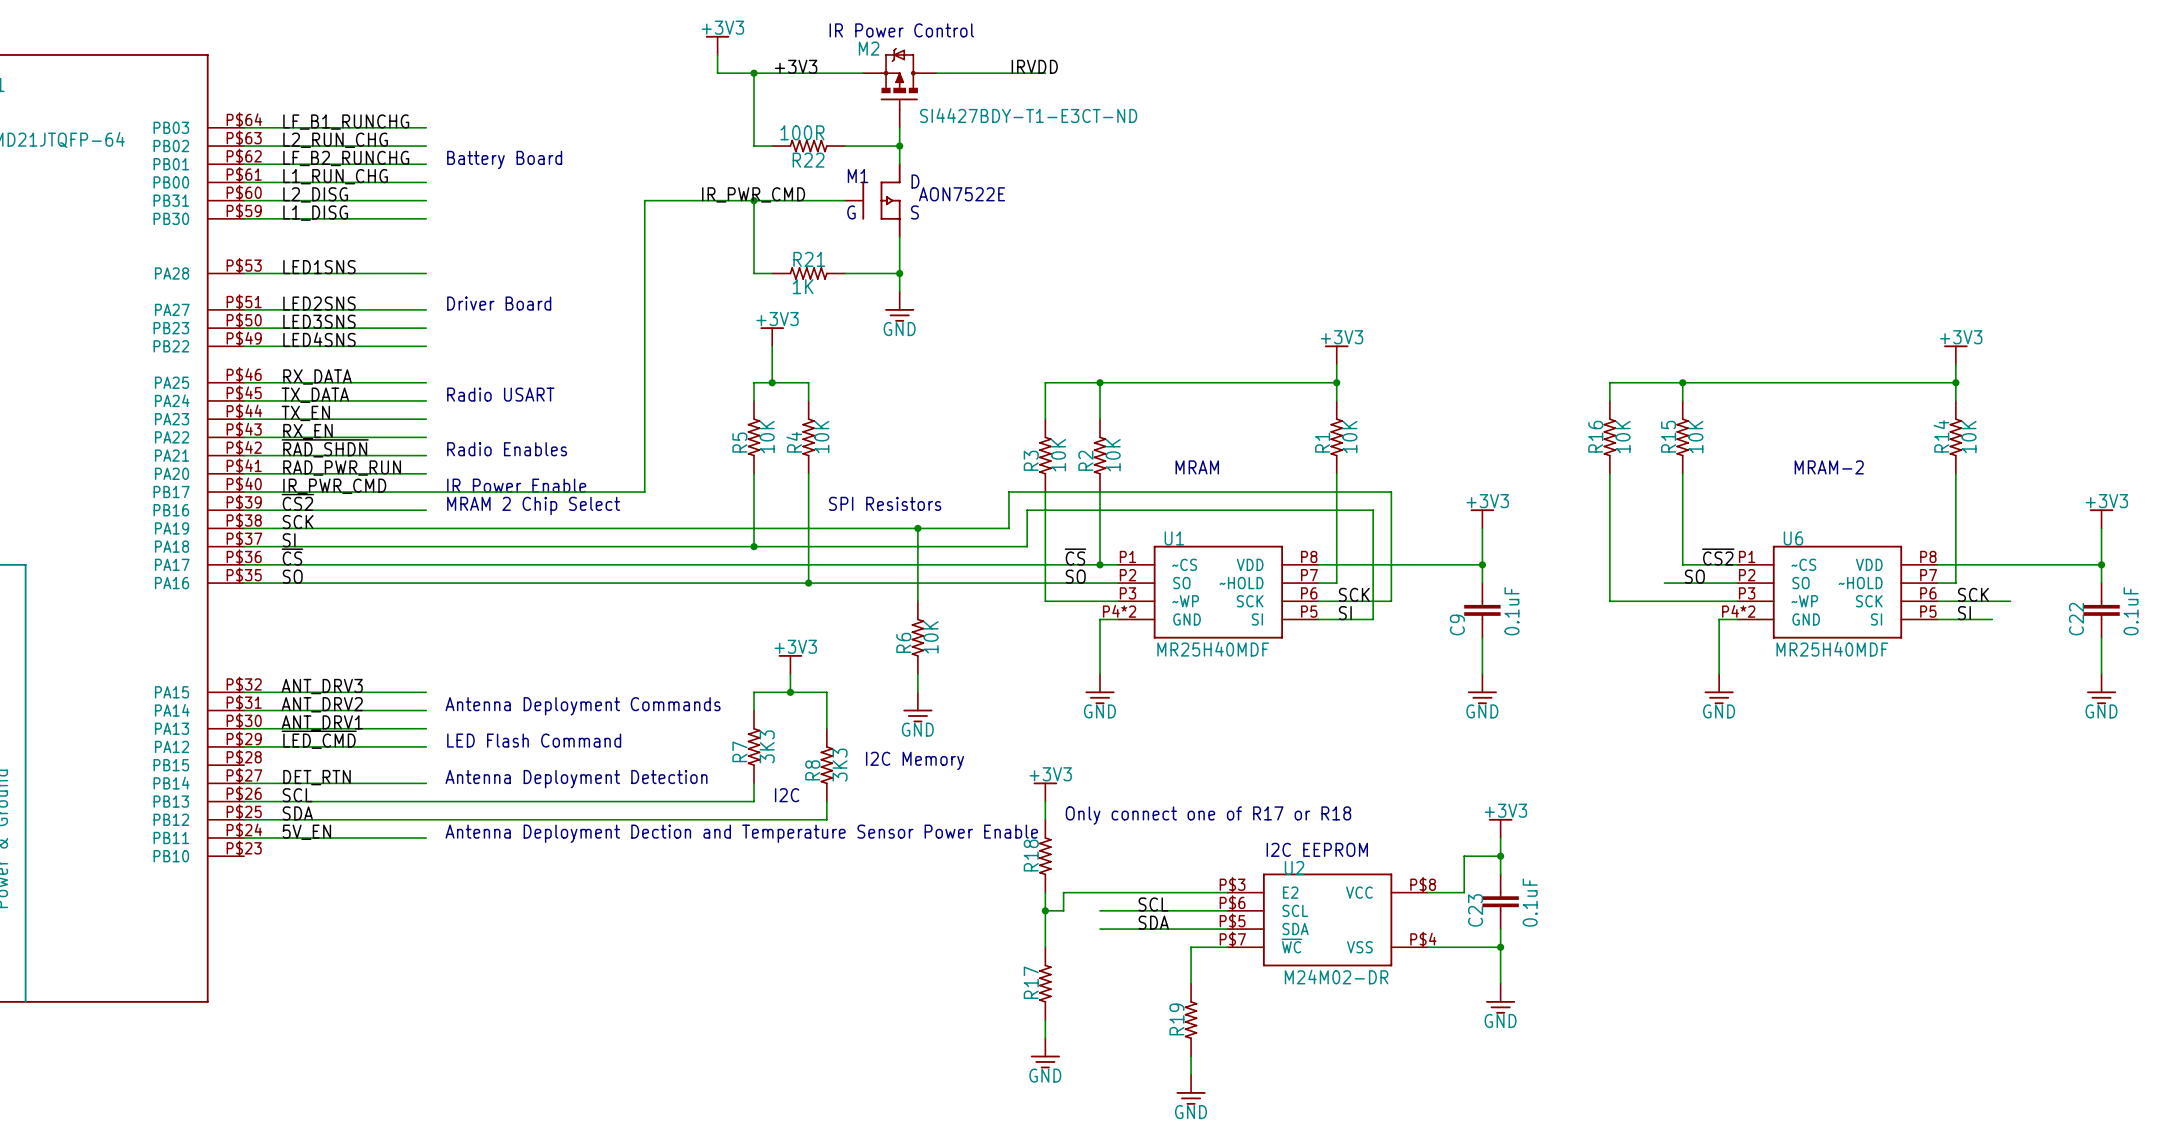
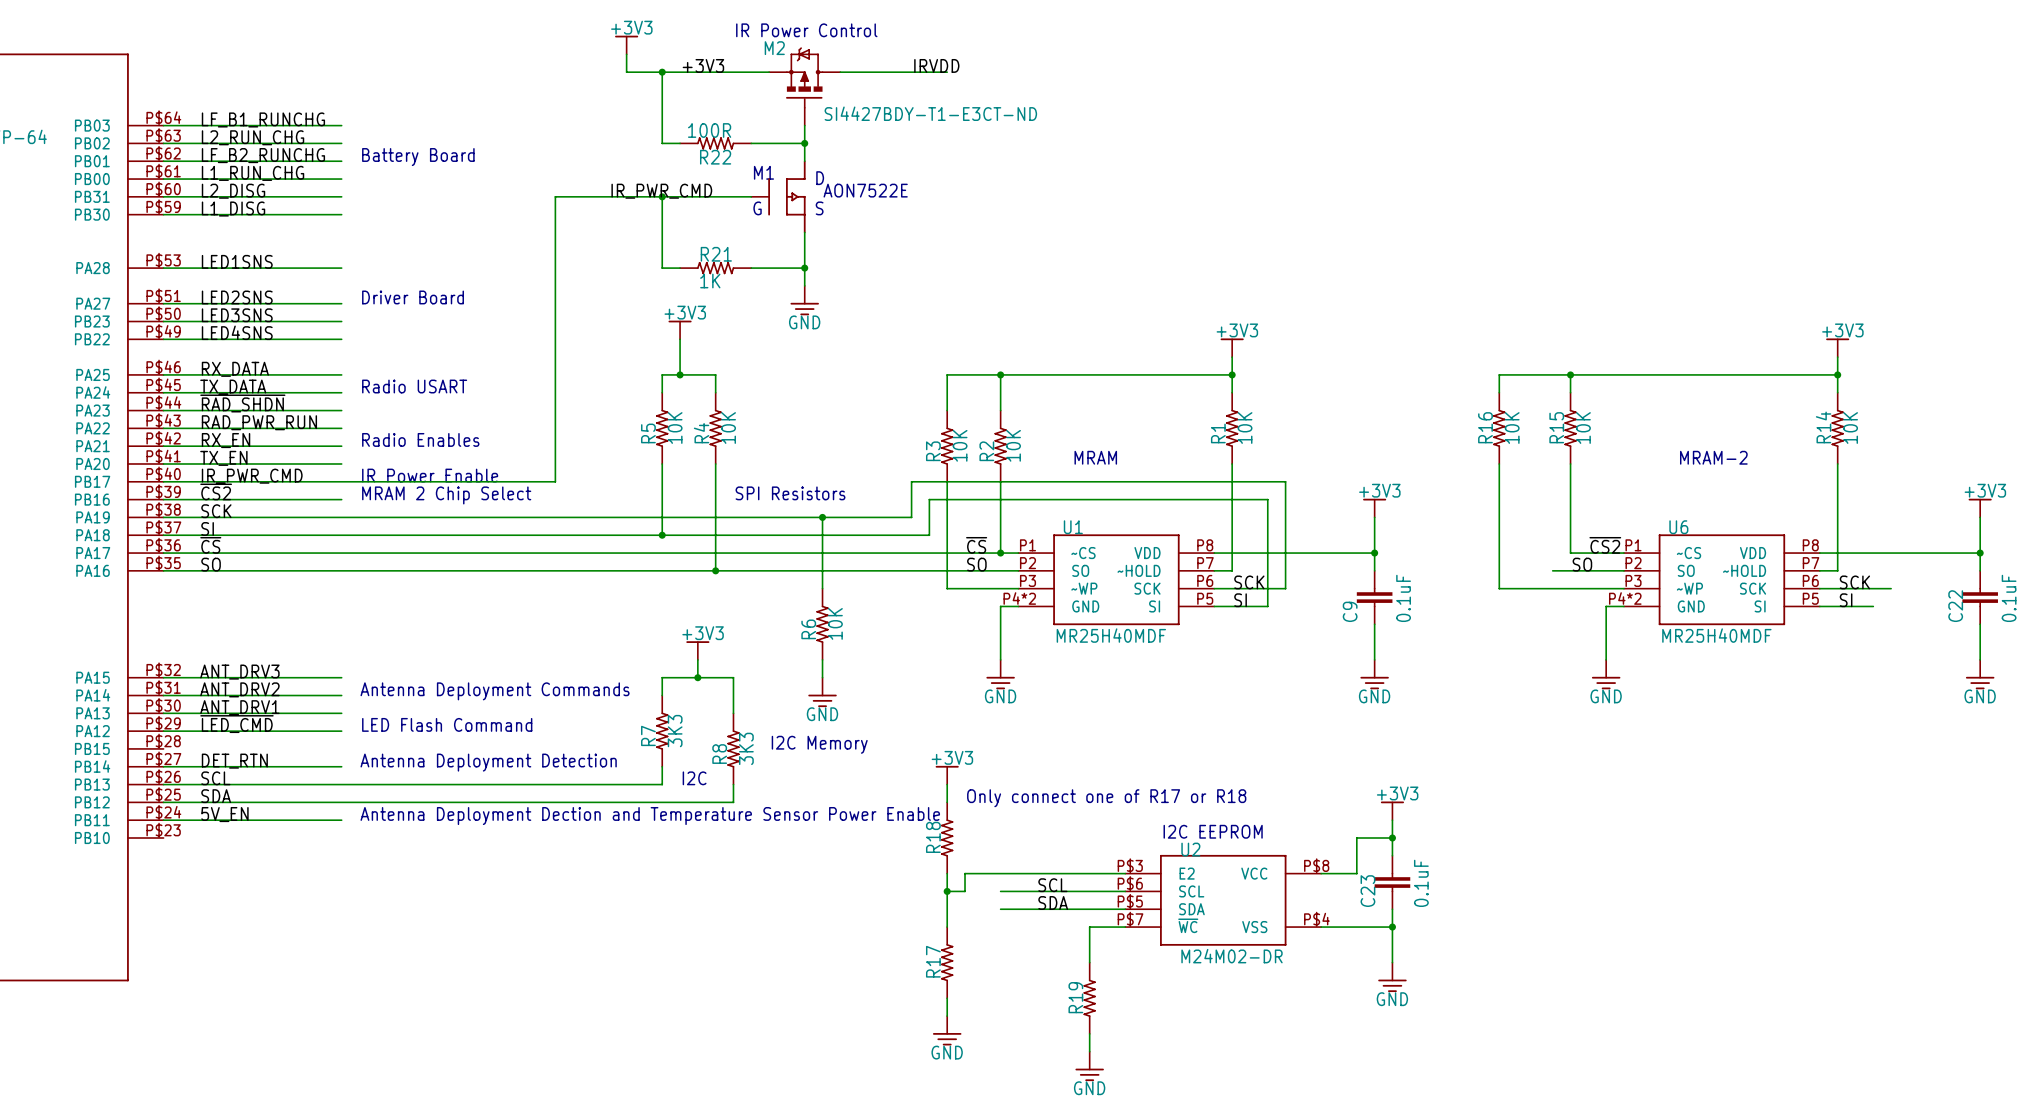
label: TX_EN (305, 413) -> ~{RAD_SHDN} (242, 403)
label: RX_EN (307, 431) -> RAD_PWR_RUN (259, 422)
label: ~{RAD_SHDN} (325, 448) -> RX_EN (226, 440)
label: RAD_PWR_RUN (342, 468) -> TX_EN (223, 458)

